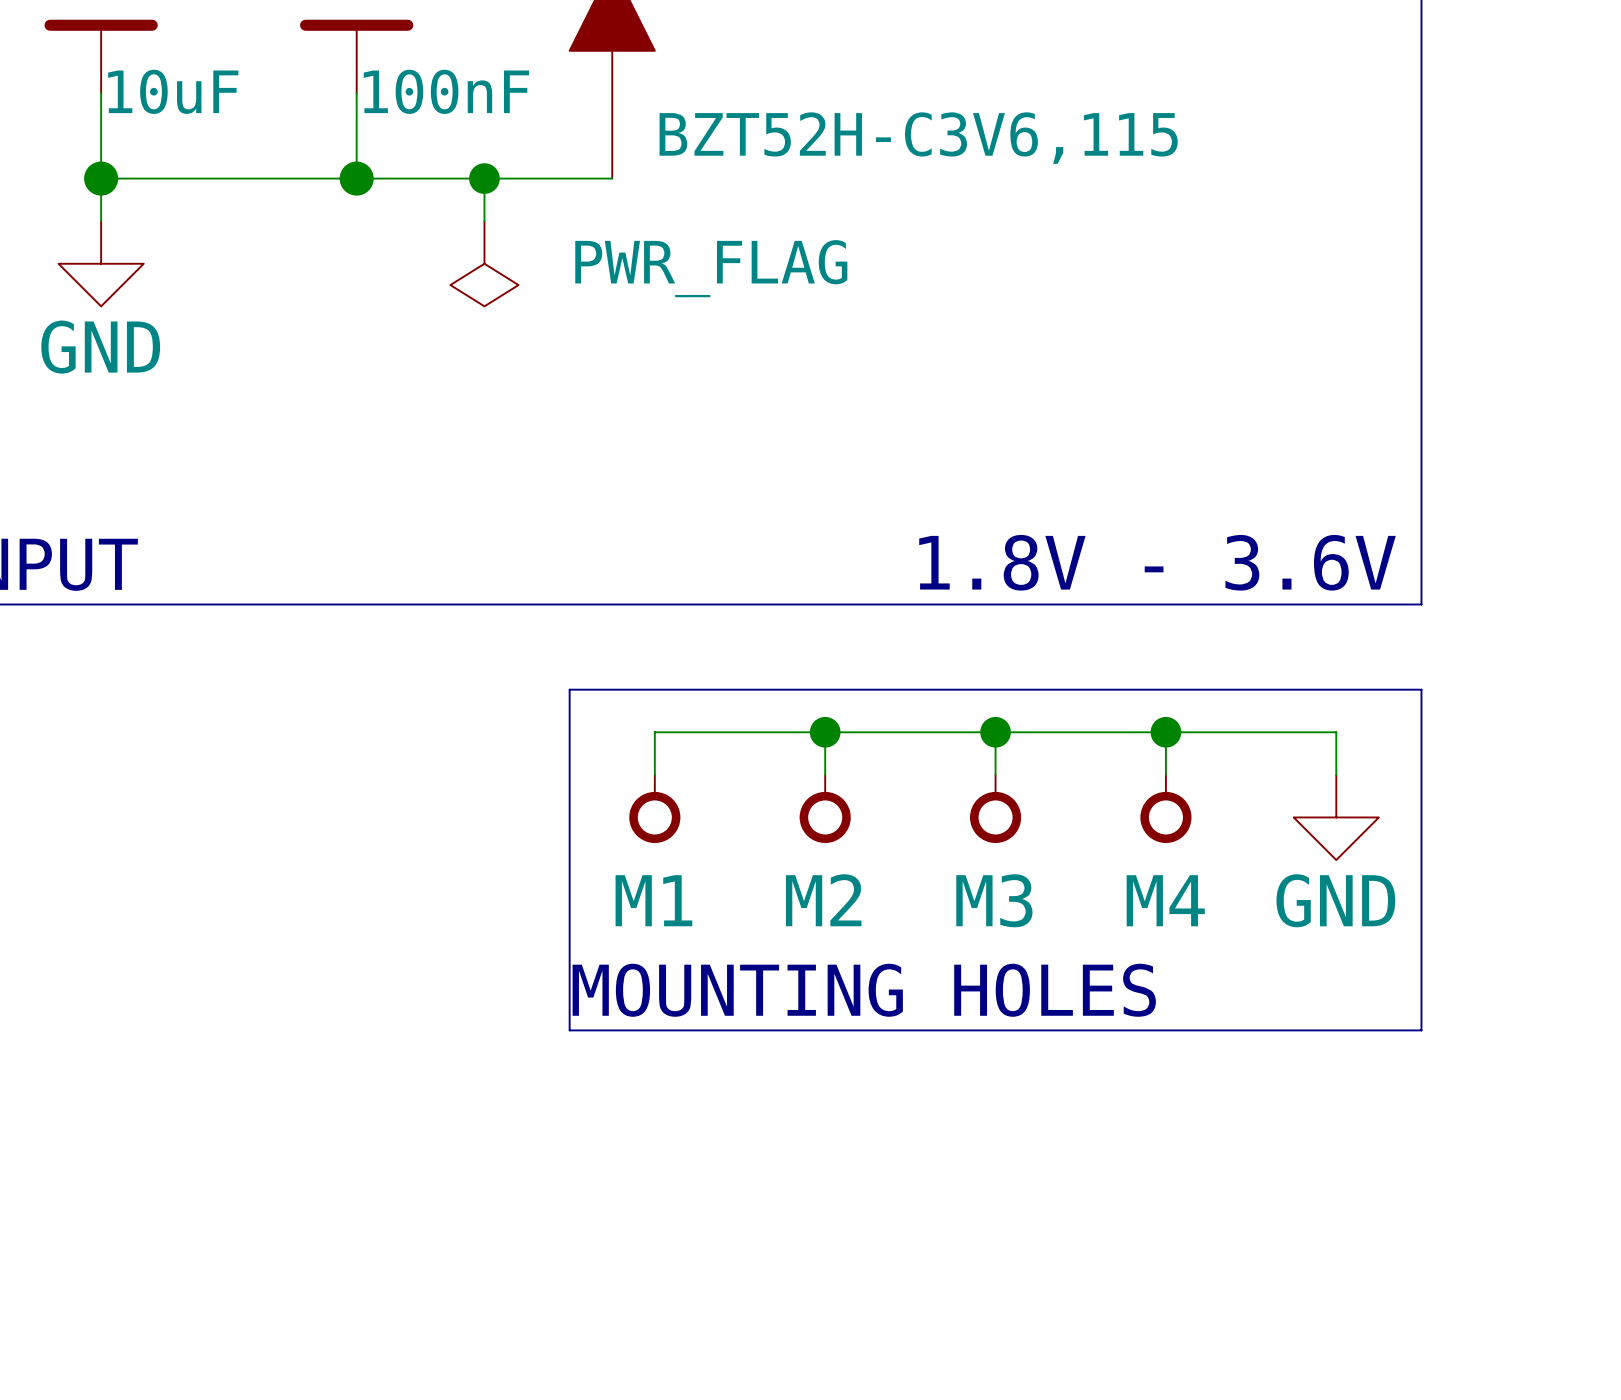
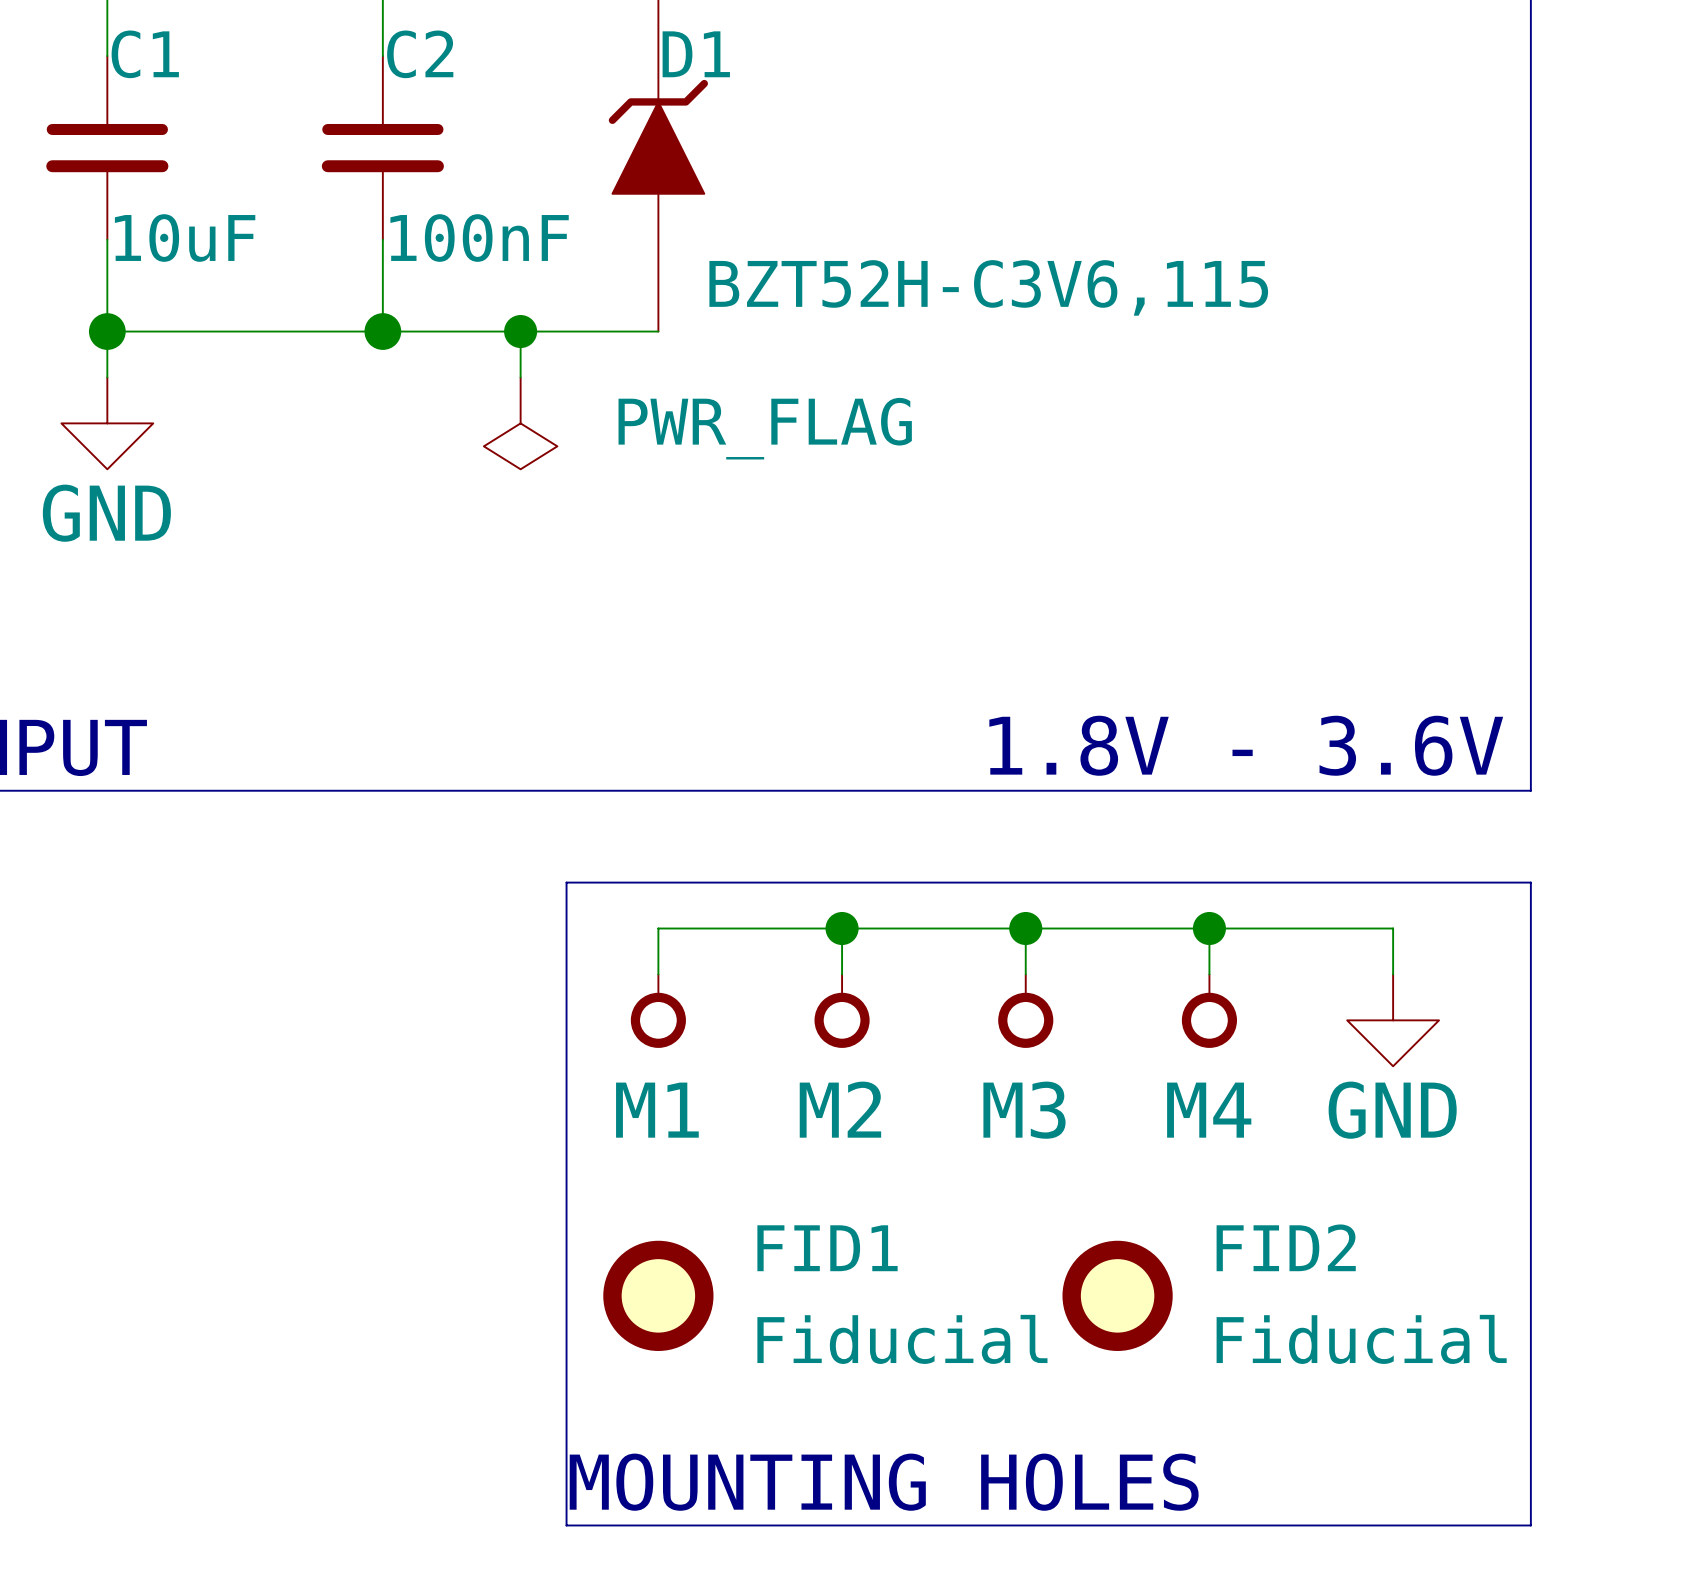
line: (569, 689) (569, 1030) (1421, 1030) -> (612, 882) (566, 882) (566, 1525) (1530, 1525) (1530, 1249)
wire: (654, 732) (654, 774) -> (704, 928) (658, 928) (658, 974)
wire: (825, 732) (825, 774) -> (1025, 928) (1025, 974)
junction position: (825, 732) -> (842, 928)
wire: (995, 732) (995, 774) -> (1209, 928) (1209, 974)
junction position: (995, 732) -> (1025, 928)
wire: (1165, 732) (1165, 774) -> (842, 928) (842, 974)
junction position: (1165, 732) -> (1209, 928)
wire: (1293, 732) (1336, 732) (1336, 774) -> (1393, 928) (1393, 974)
M1 position: (654, 808) -> (658, 1011)
M2 position: (825, 808) -> (842, 1011)
M3 position: (995, 808) -> (1025, 1011)
M4 position: (1165, 808) -> (1209, 1011)
power symbol position: GND (1336, 817) -> GND (1393, 1020)
text position: MOUNTING HOLES (864, 990) -> MOUNTING HOLES (884, 1482)
FID1: none -> Fiducial (658, 1295)
FID2: none -> Fiducial (1117, 1295)

